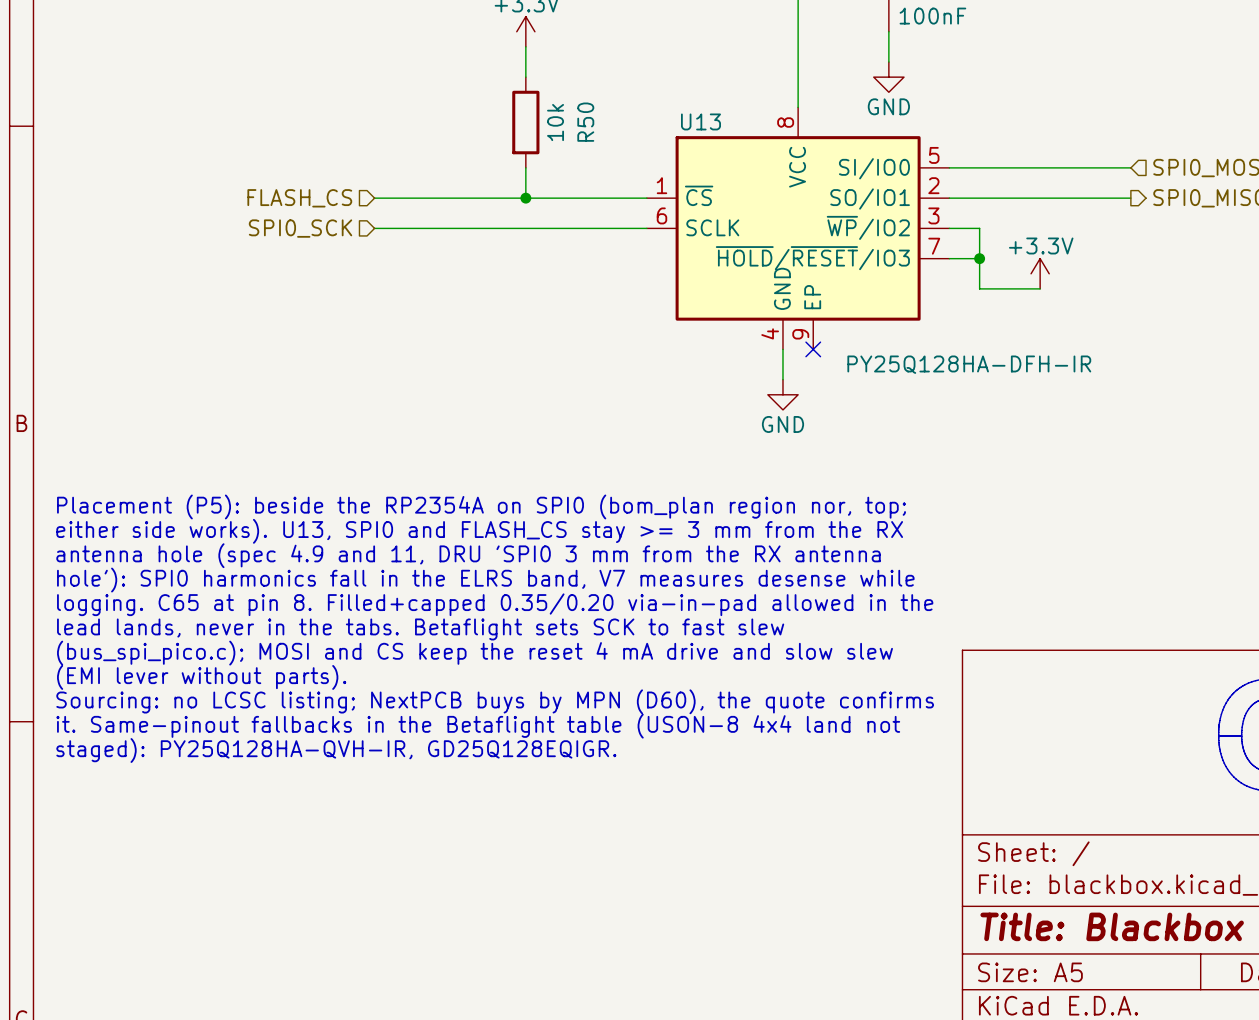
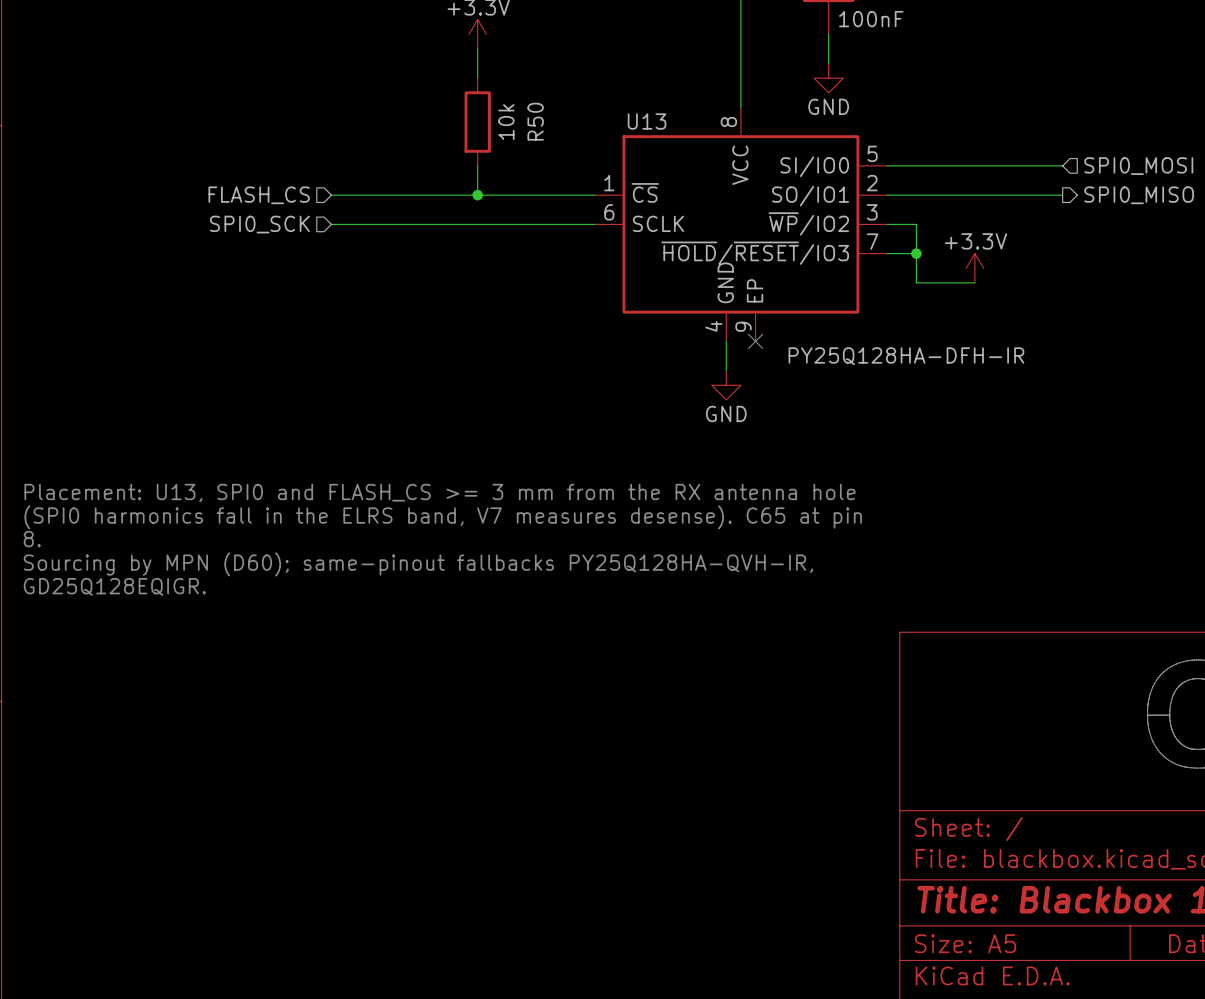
text: Placement (P5): beside the RP2354A on SPI0 (bom_plan region nor, top; (481, 506) -> Placement: U13, SPI0 and FLASH_CS >= 3 mm from the RX antenna hole (440, 493)
text: either side works). U13, SPI0 and FLASH_CS stay >= 3 mm from the RX (479, 531) -> (SPI0 harmonics fall in the ELRS band, V7 measures desense). C65 at pin (443, 517)
text: antenna hole (spec 4.9 and 11, DRU 'SPI0 3 mm from the RX antenna (468, 555) -> 8. (32, 539)
text: hole'): SPI0 harmonics fall in the ELRS band, V7 measures desense while (485, 580) -> Sourcing by MPN (D60); same-pinout fallbacks PY25Q128HA-QVH-IR, (418, 564)
text: logging. C65 at pin 8. Filled+capped 0.35/0.20 via-in-pad allowed in the (495, 604) -> GD25Q128EQIGR. (114, 586)
text: lead lands, never in the tabs. Betaflight sets SCK to fast slew (420, 629) -> none
text: (bus_spi_pico.c); MOSI and CS keep the reset 4 mA drive and slow slew (475, 653) -> none
text: (EMI lever without parts). (201, 677) -> none
text: Sourcing: no LCSC listing; NextPCB buys by MPN (D60), the quote confirms (495, 701) -> none
text: it. Same-pinout fallbacks in the Betaflight table (USON-8 4x4 land not (478, 726) -> none
text: staged): PY25Q128HA-QVH-IR, GD25Q128EQIGR. (336, 750) -> none

